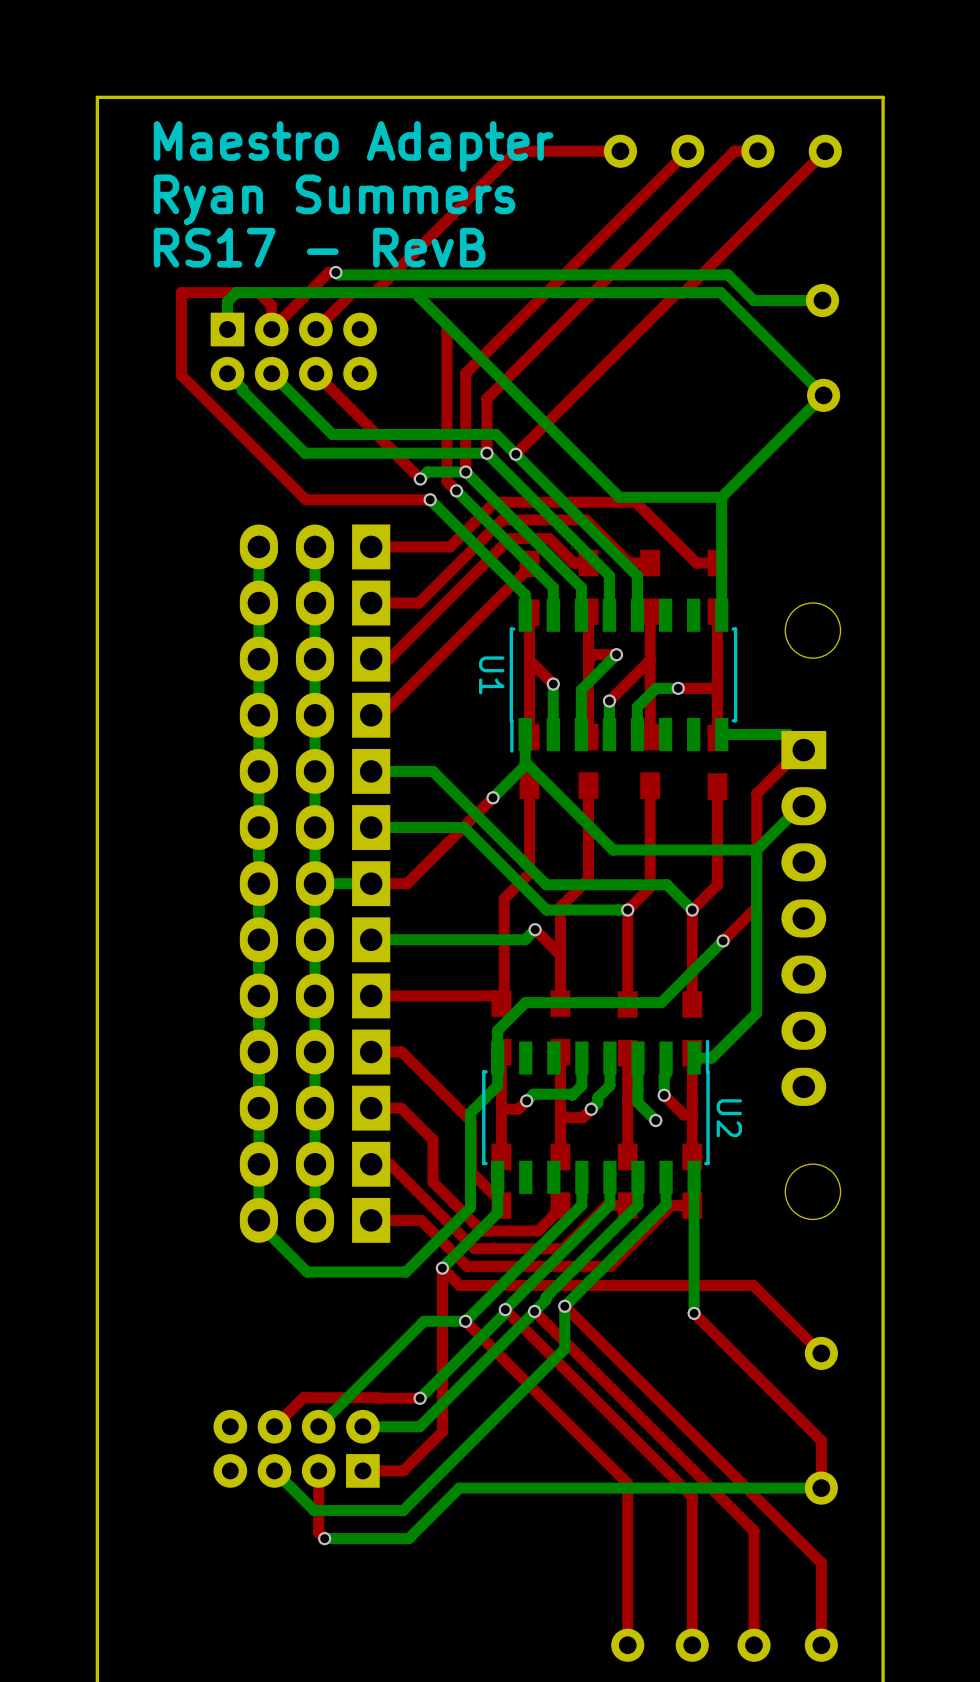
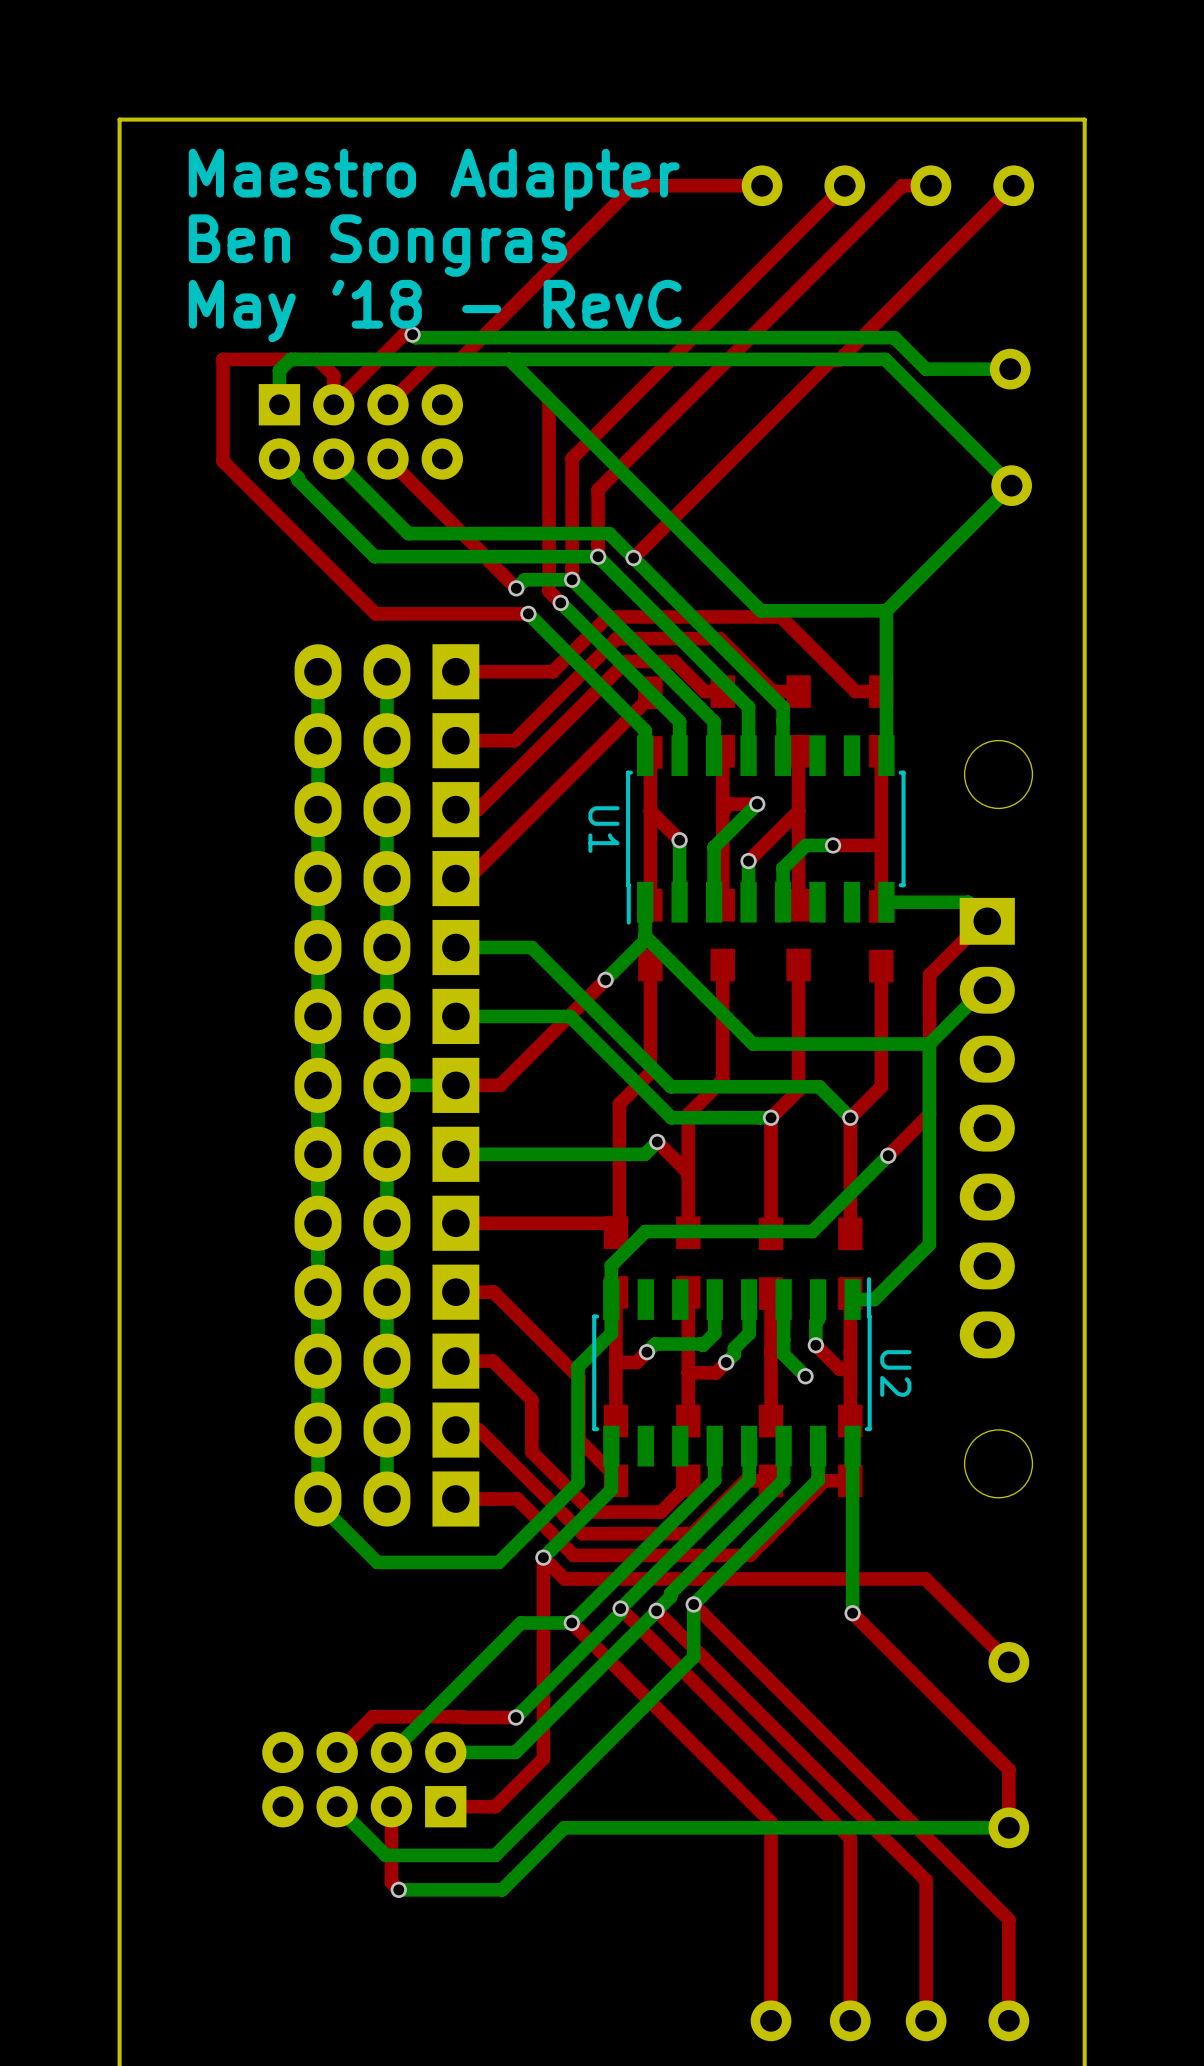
text: Ryan Summers (334, 199) -> Ben Songras (378, 245)
text: RS17 - RevB (319, 247) -> May '18 - RevC (435, 311)

